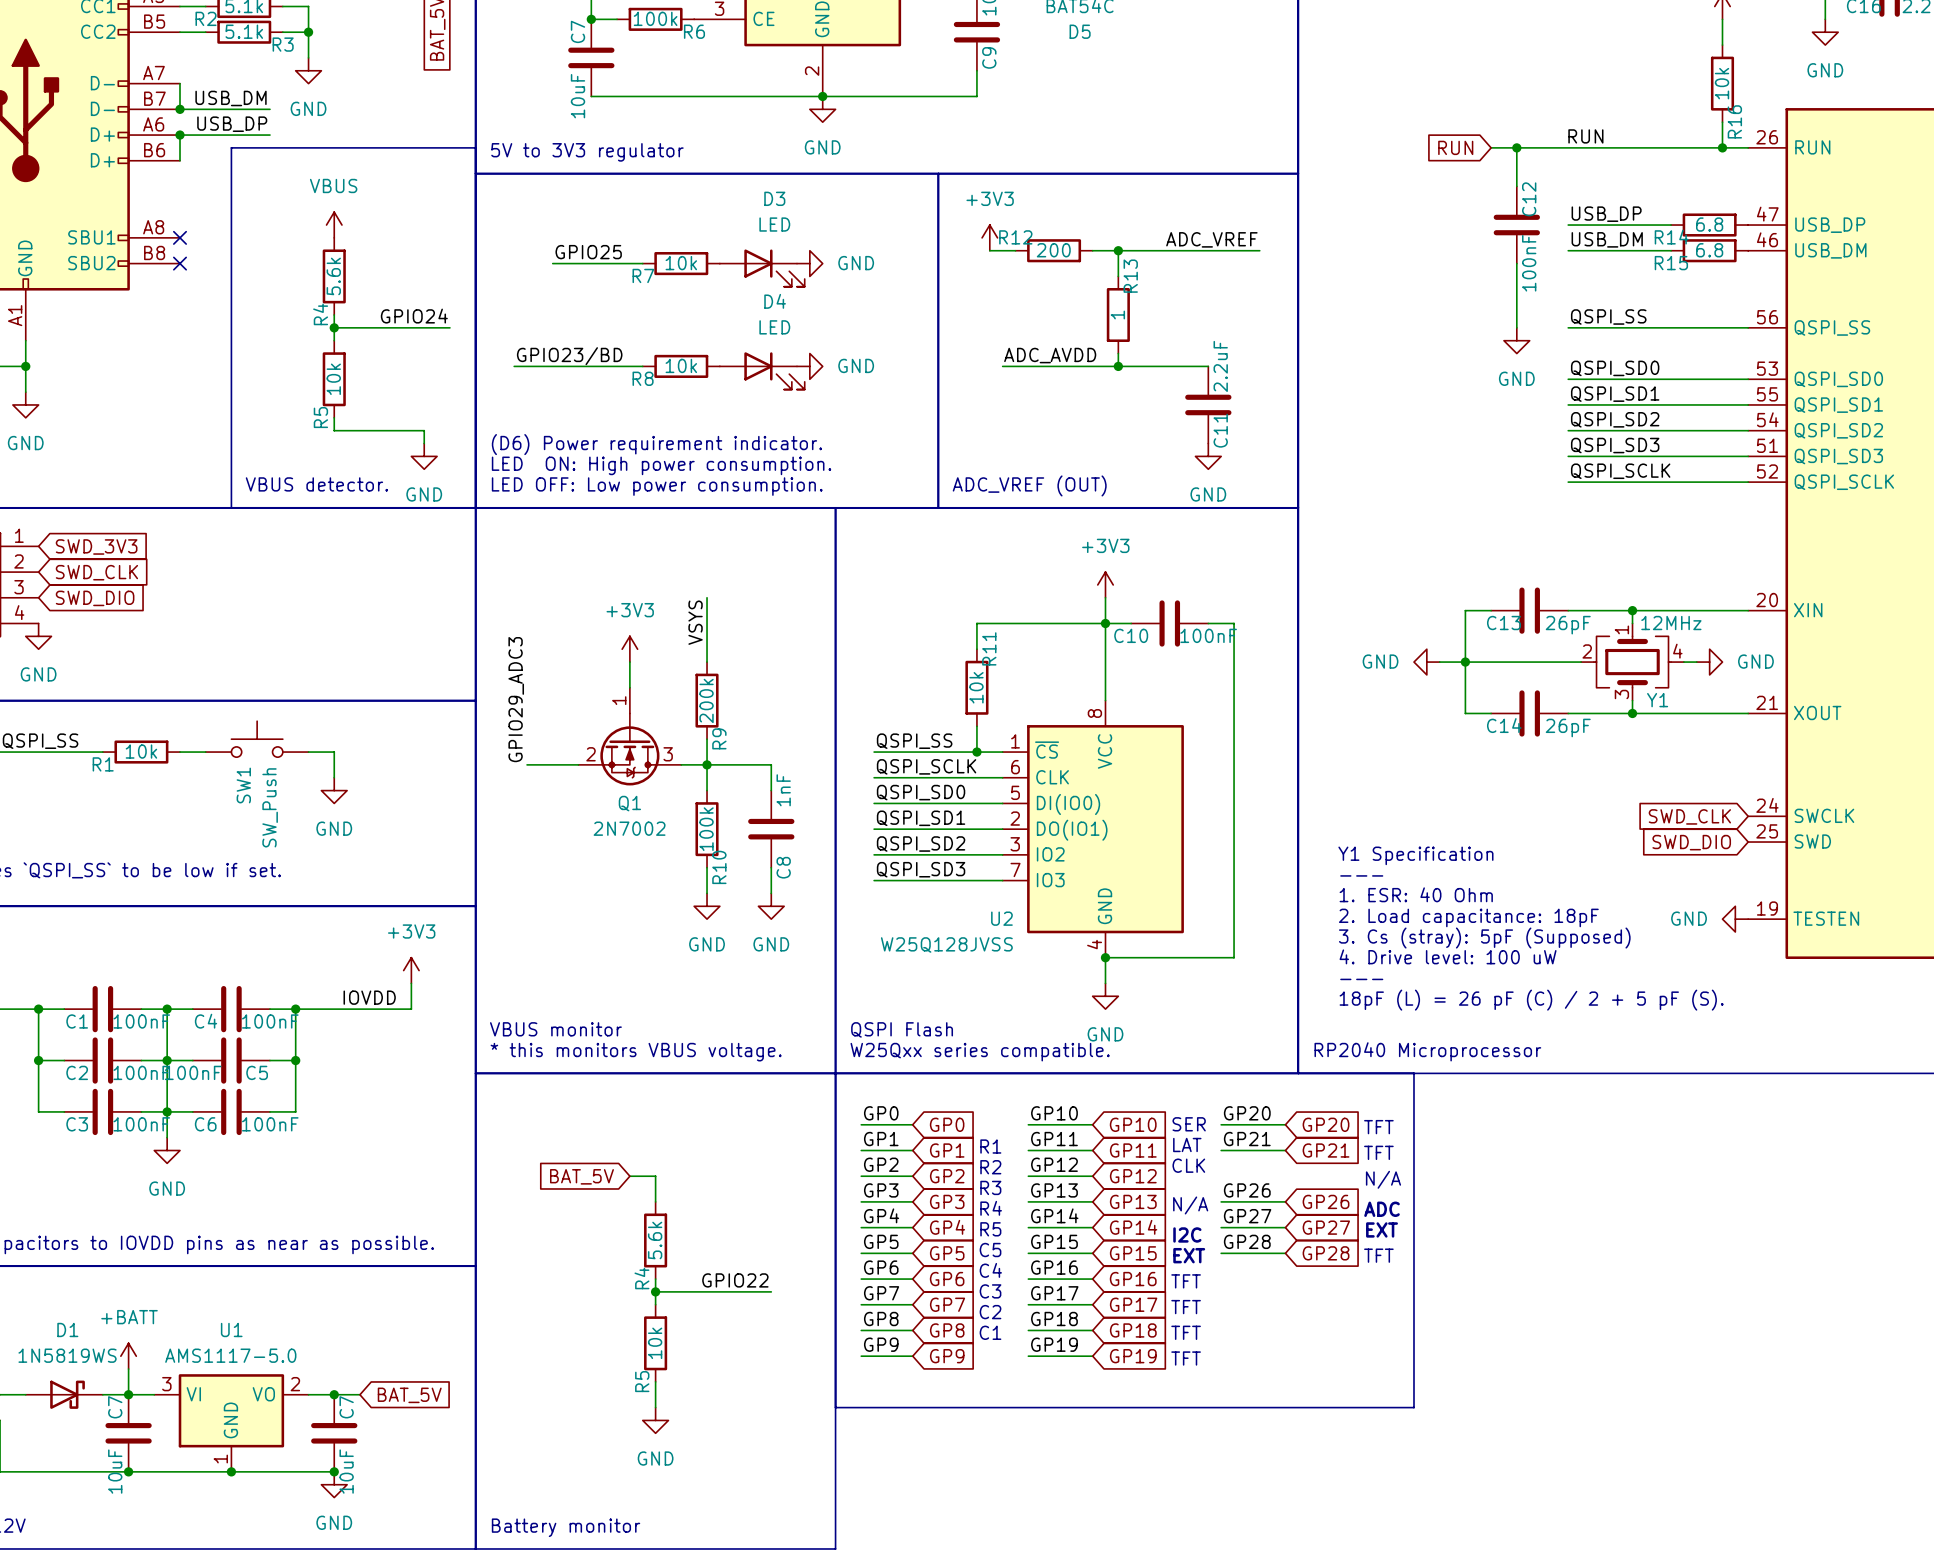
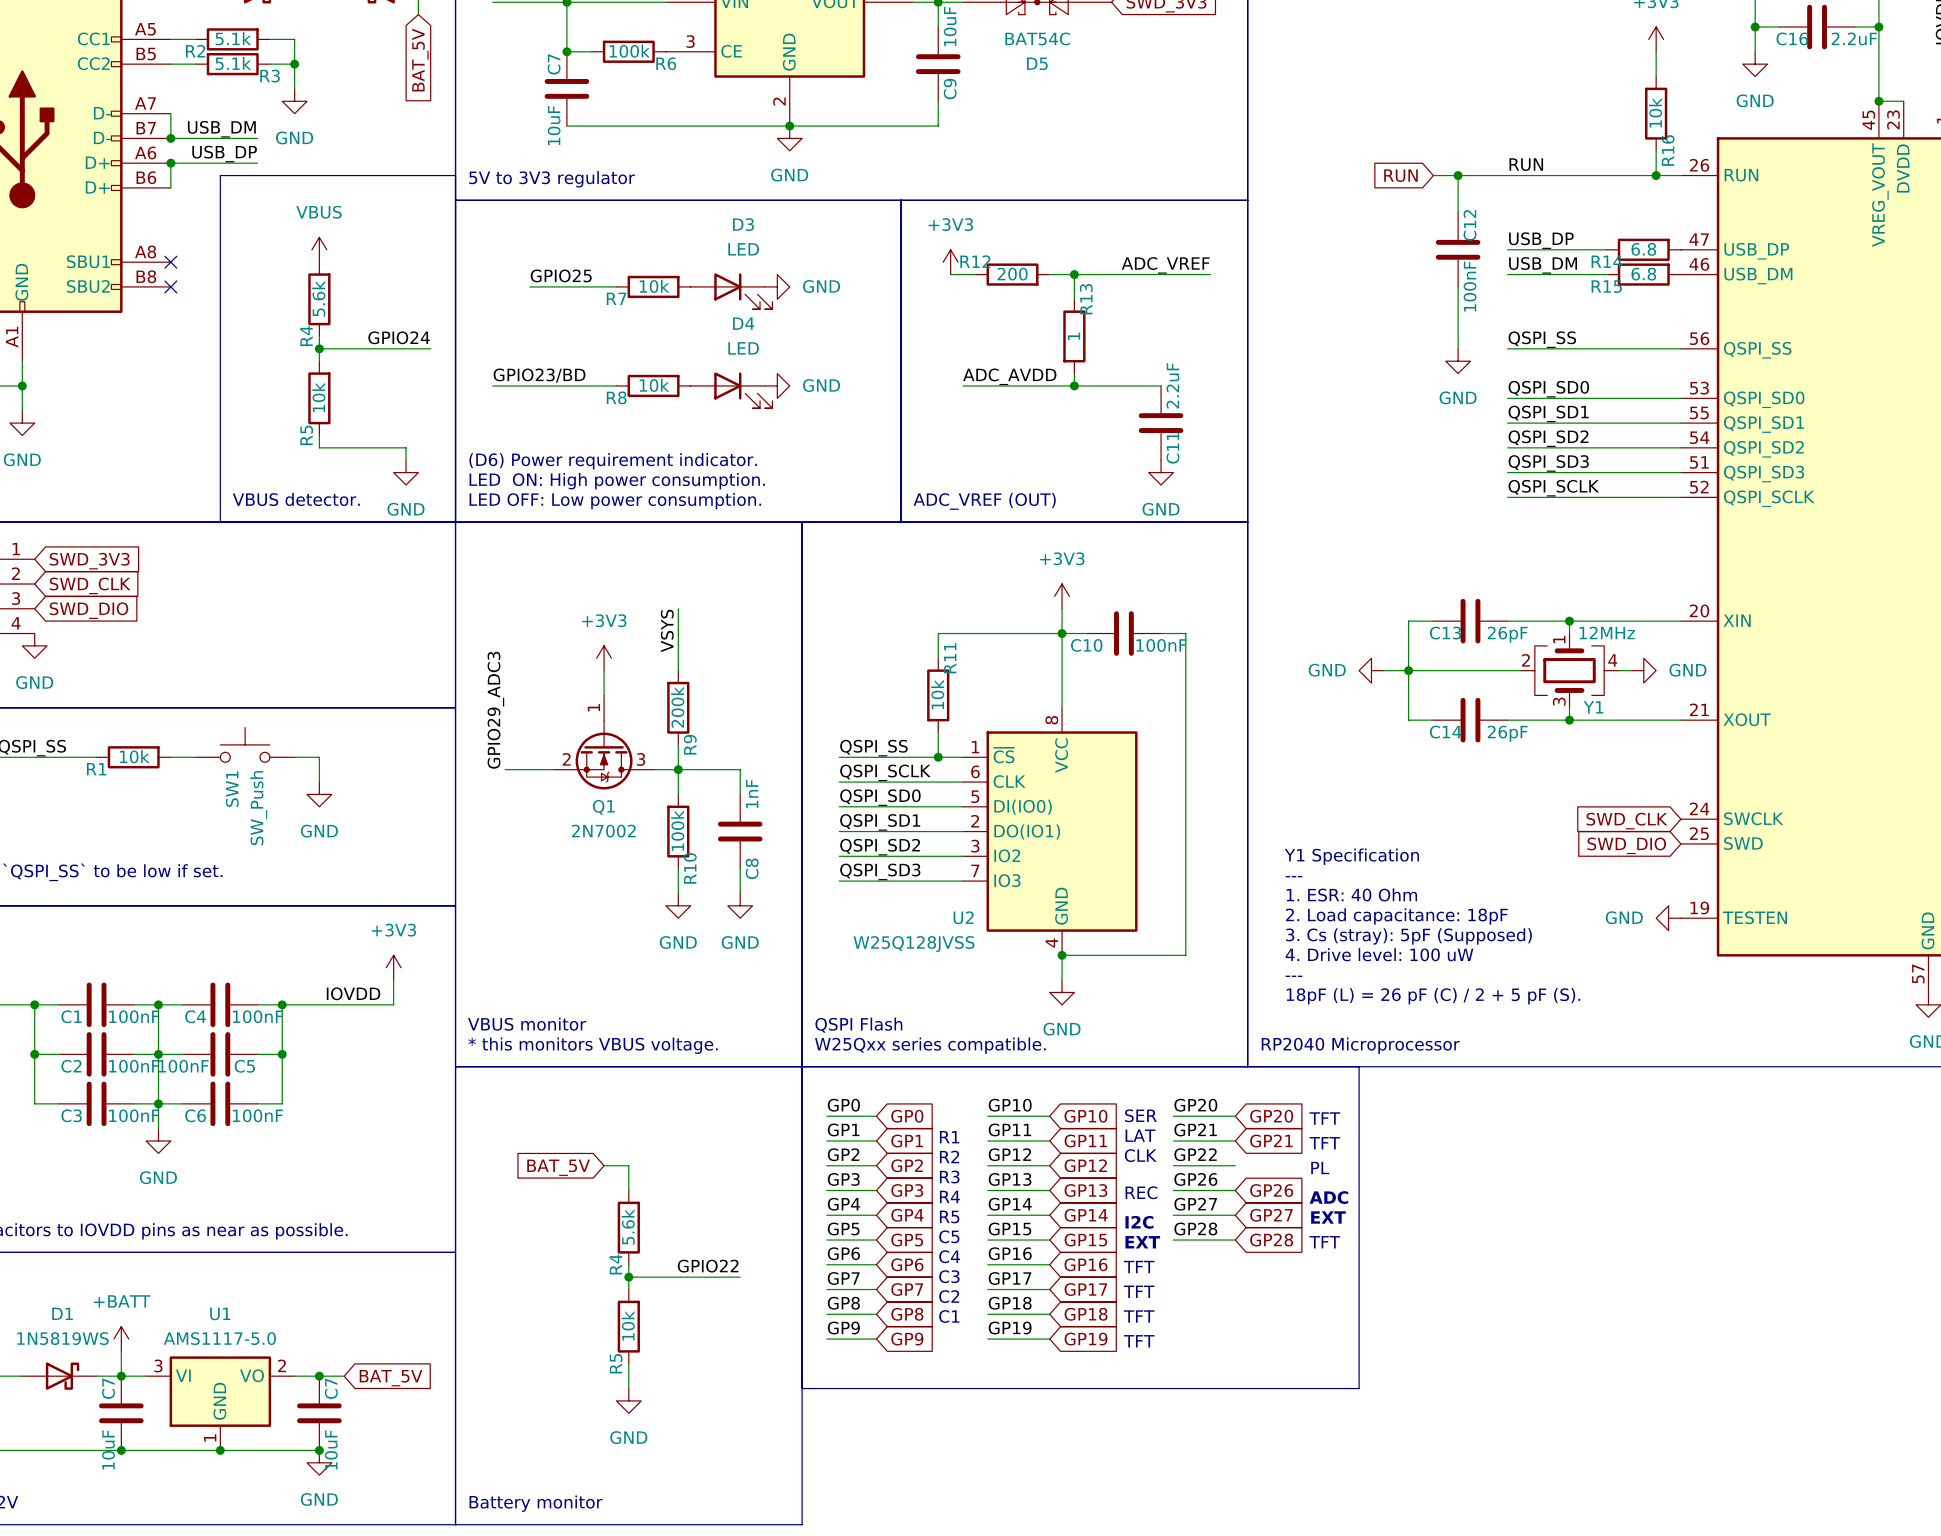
label: none -> GP22 (1195, 1154)
wire: none -> (1173, 1165) (1235, 1165)
text: N/A (1383, 1179) -> PL (1320, 1167)
text: N/A (1190, 1205) -> REC (1141, 1192)

